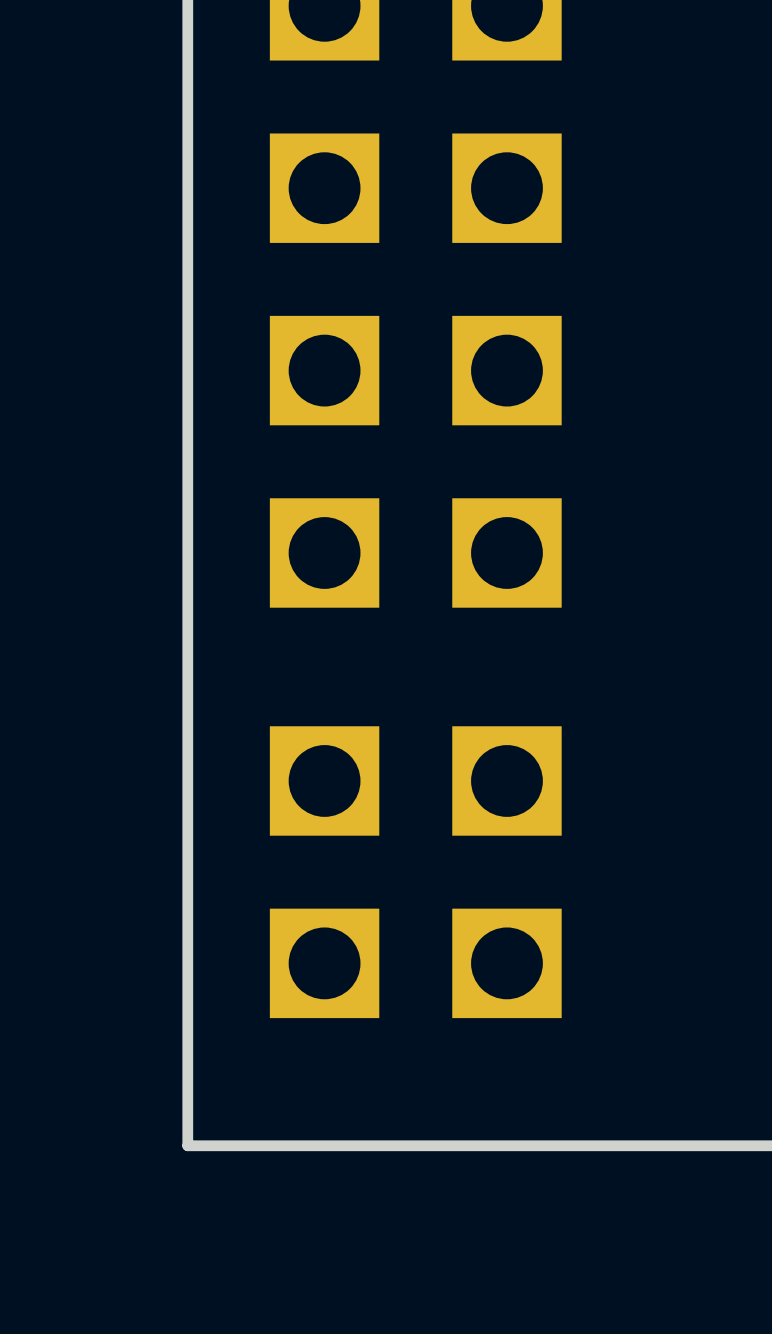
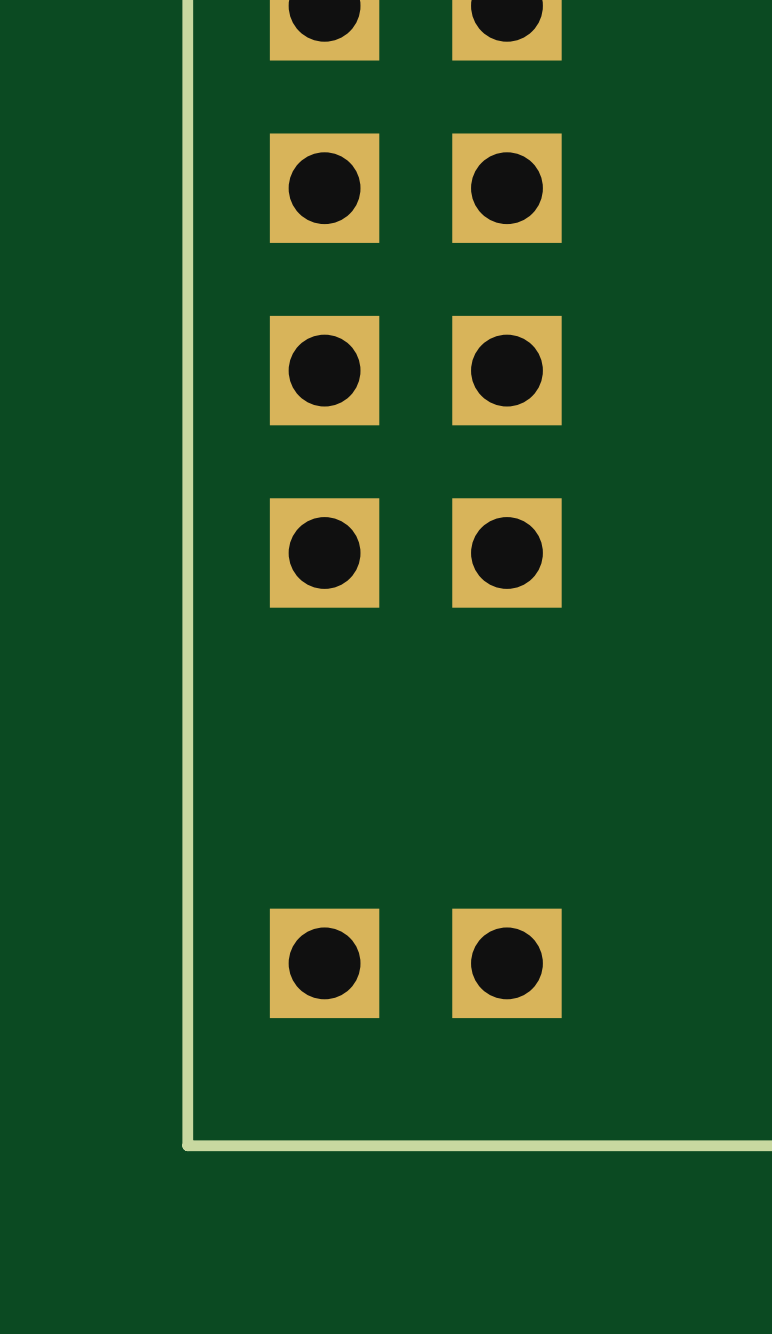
part: (415, 780) -> none

